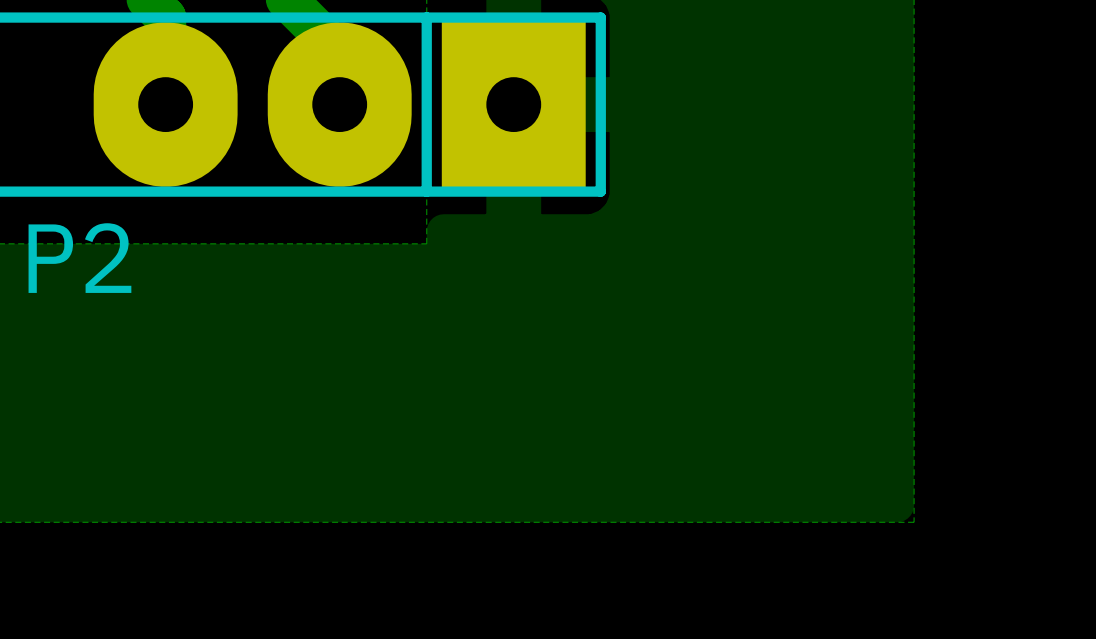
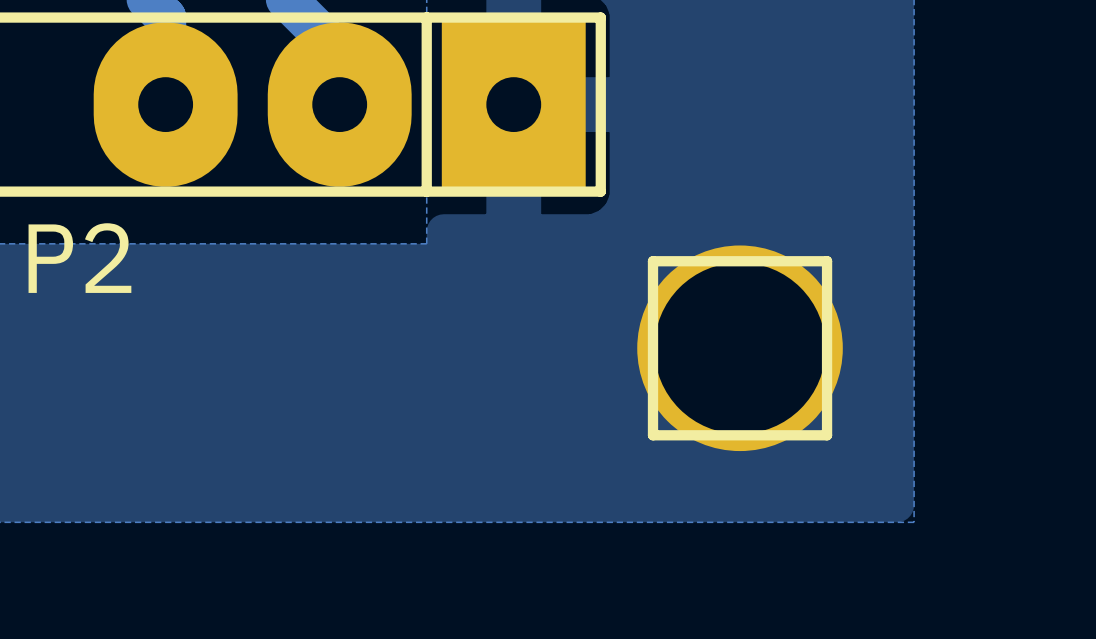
part: none -> (740, 348)

